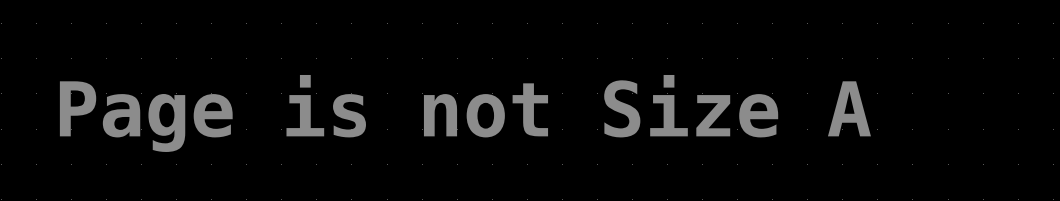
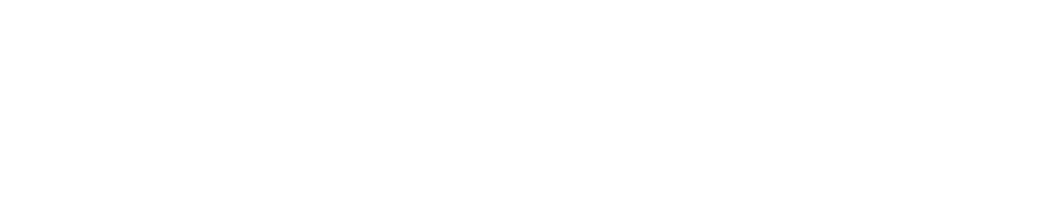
text: Page is not Size A (465, 113) -> none

